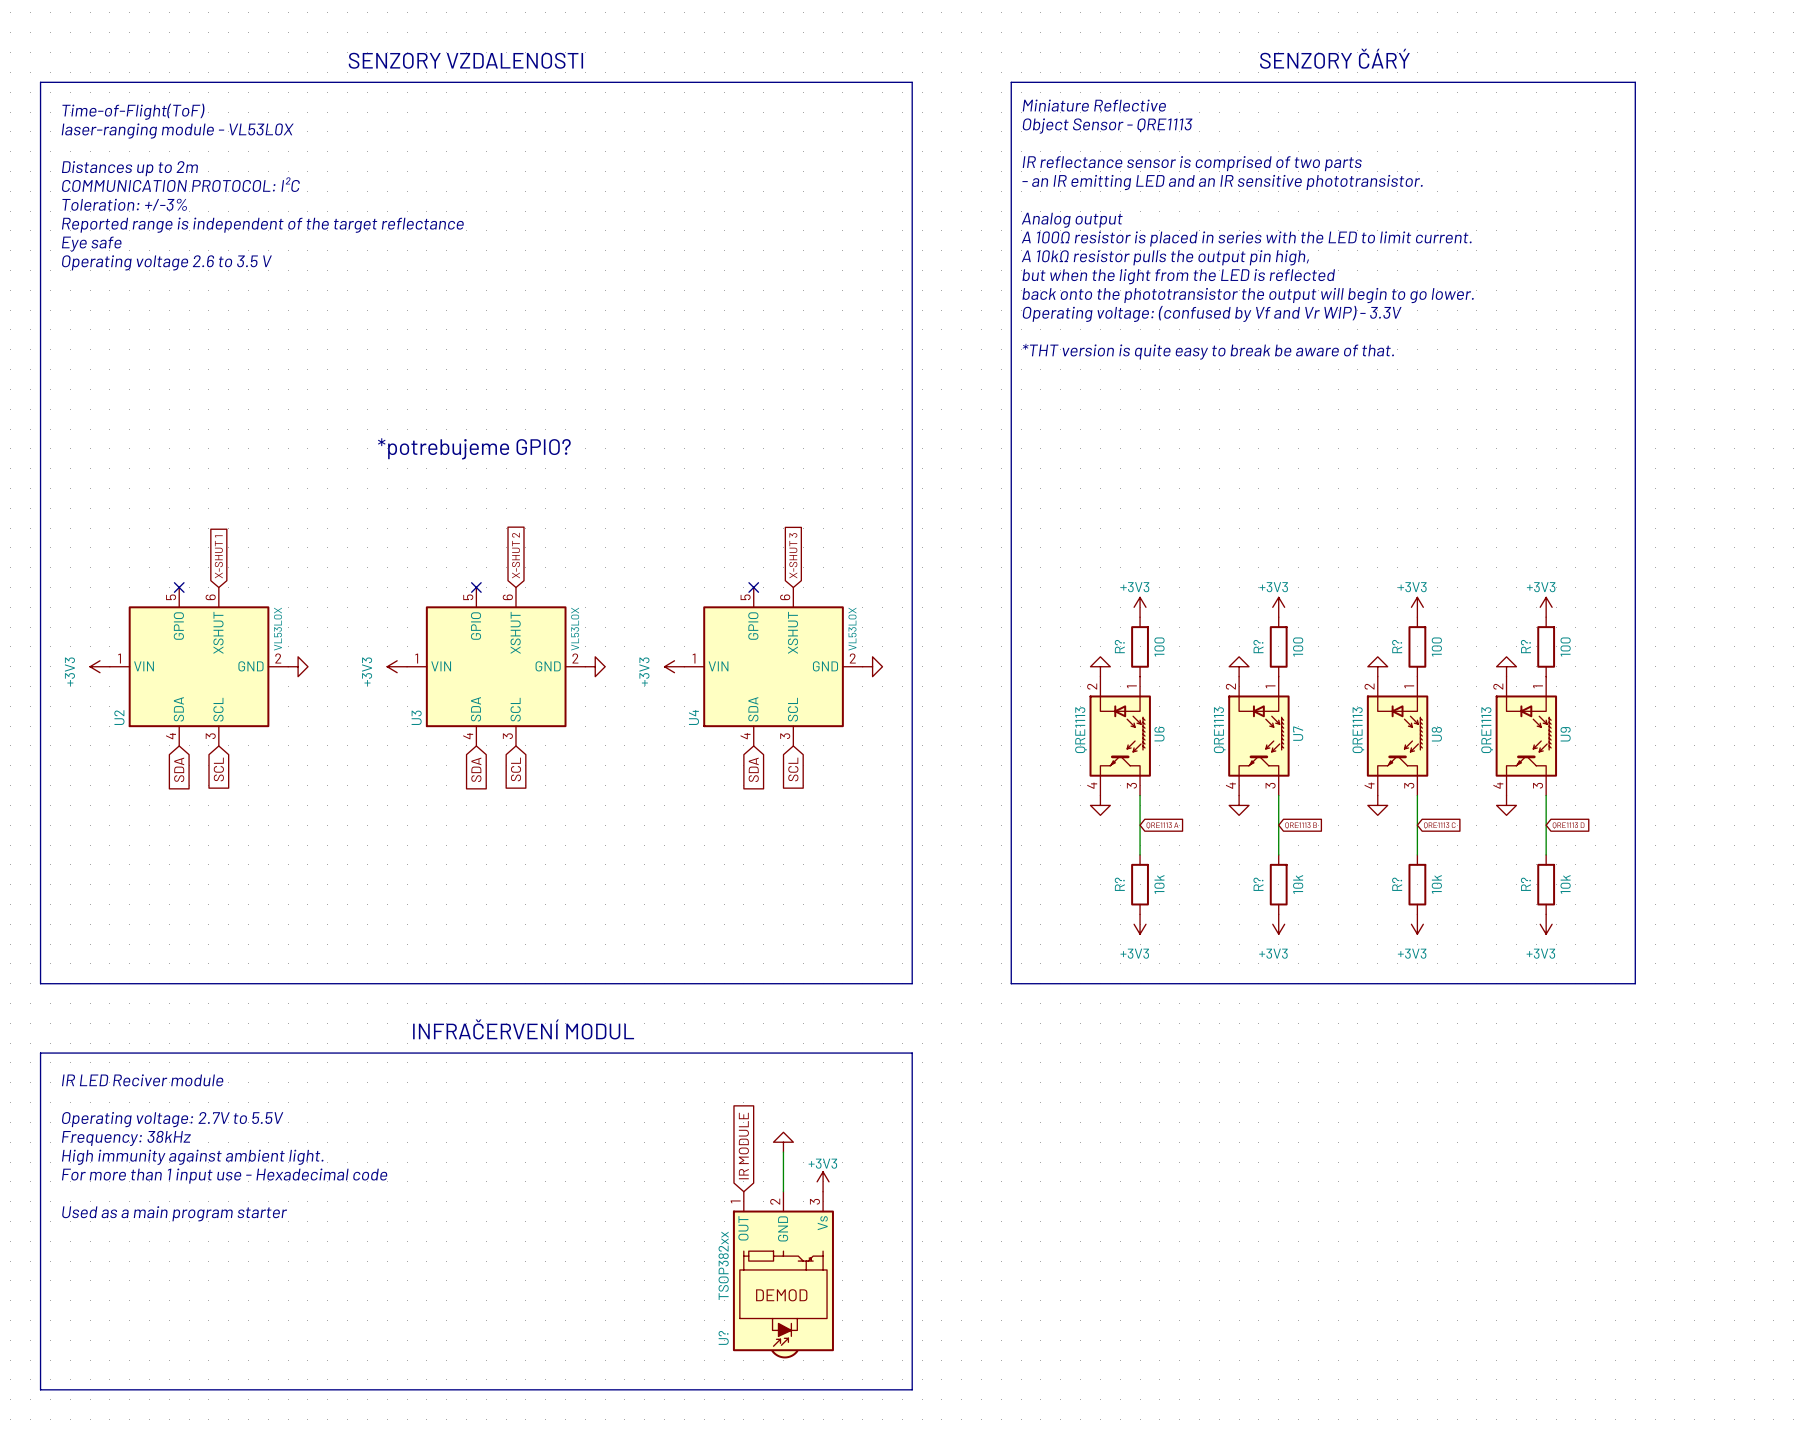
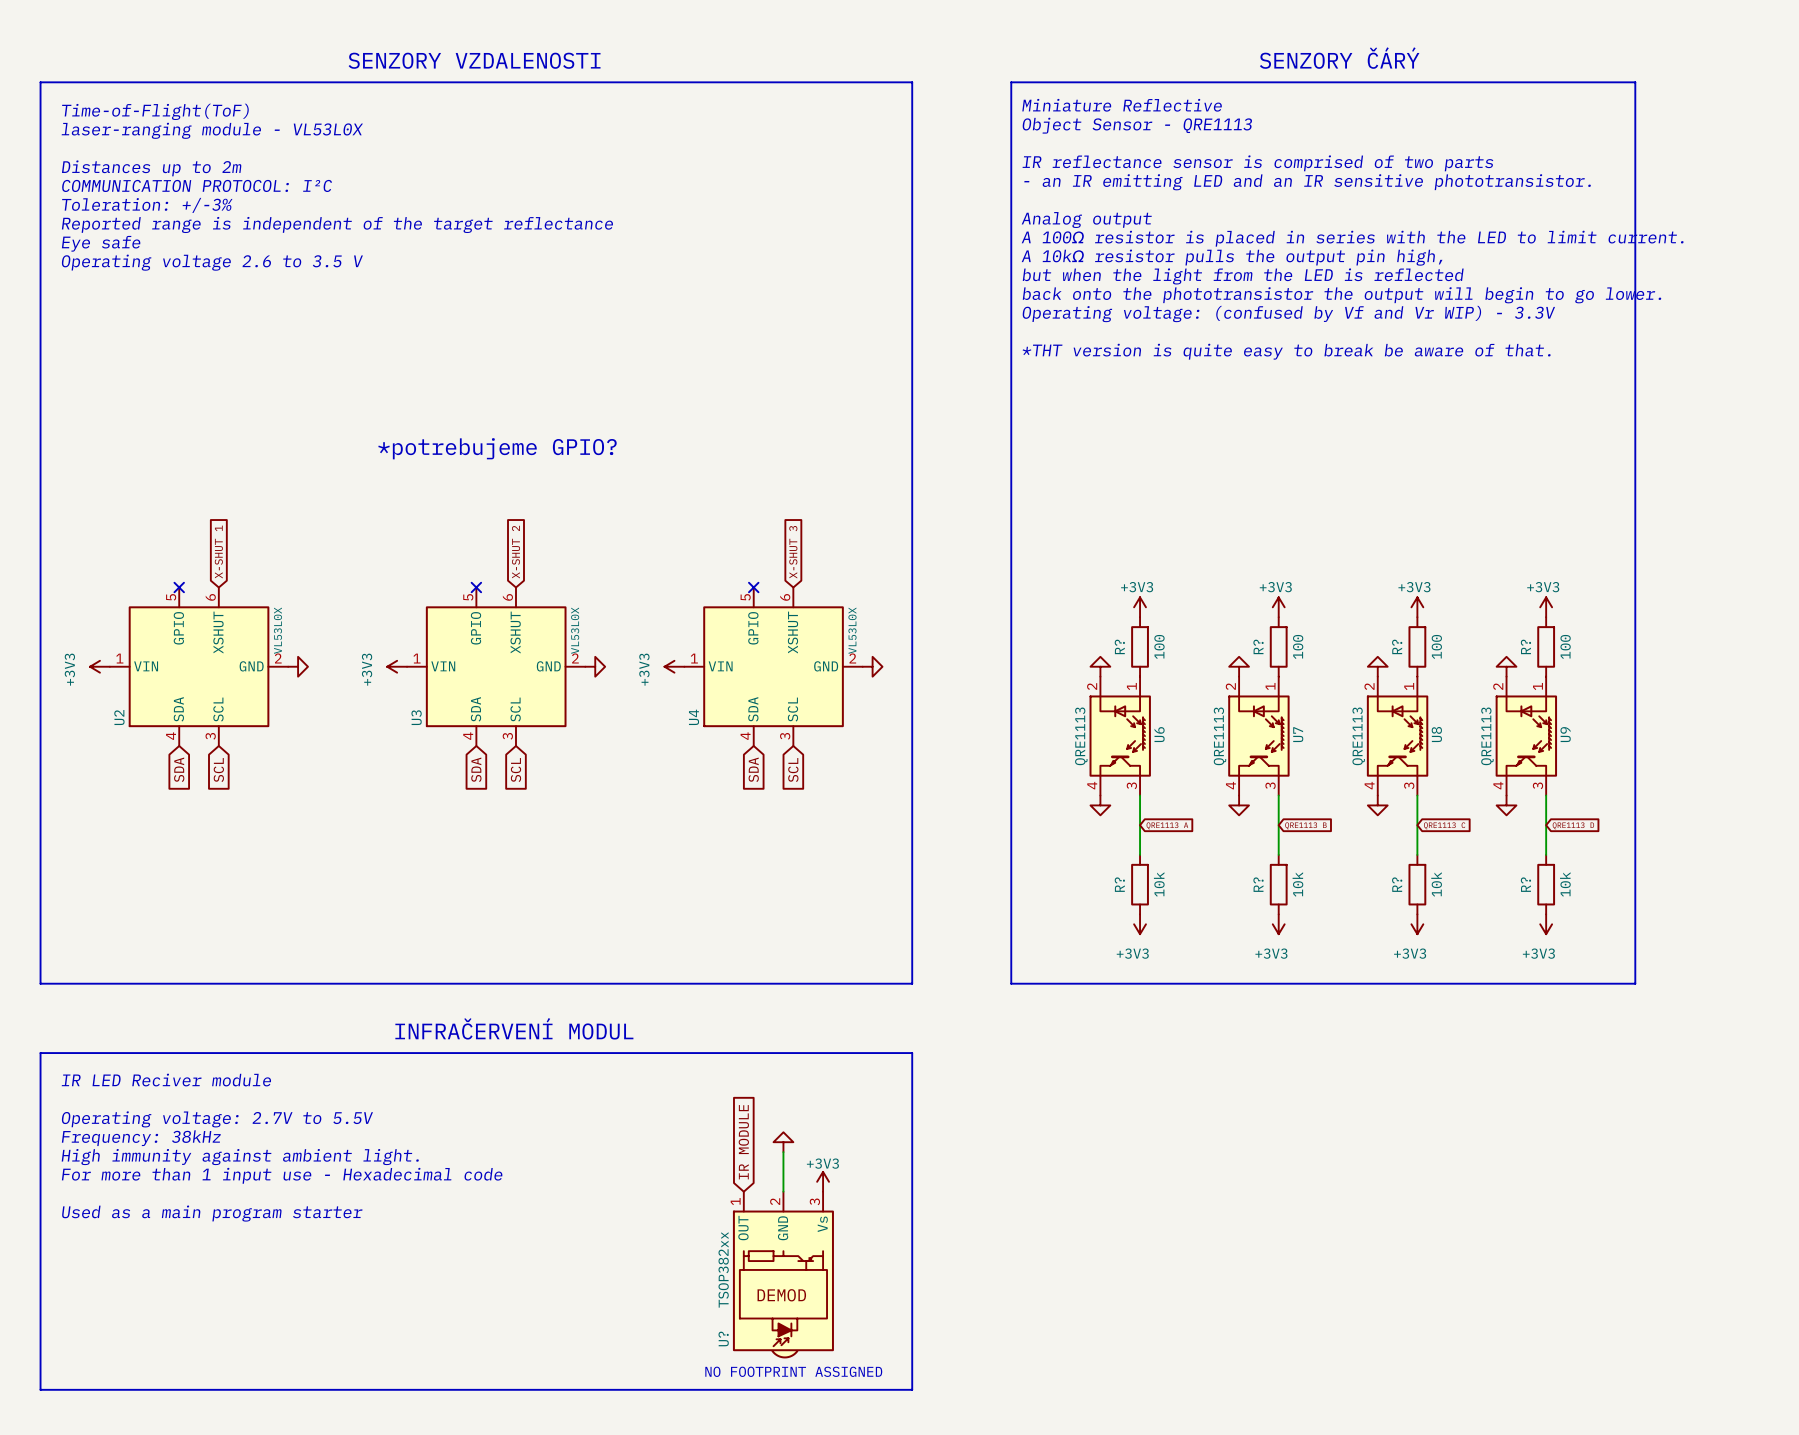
text: none -> NO FOOTPRINT ASSIGNED (793, 1371)

